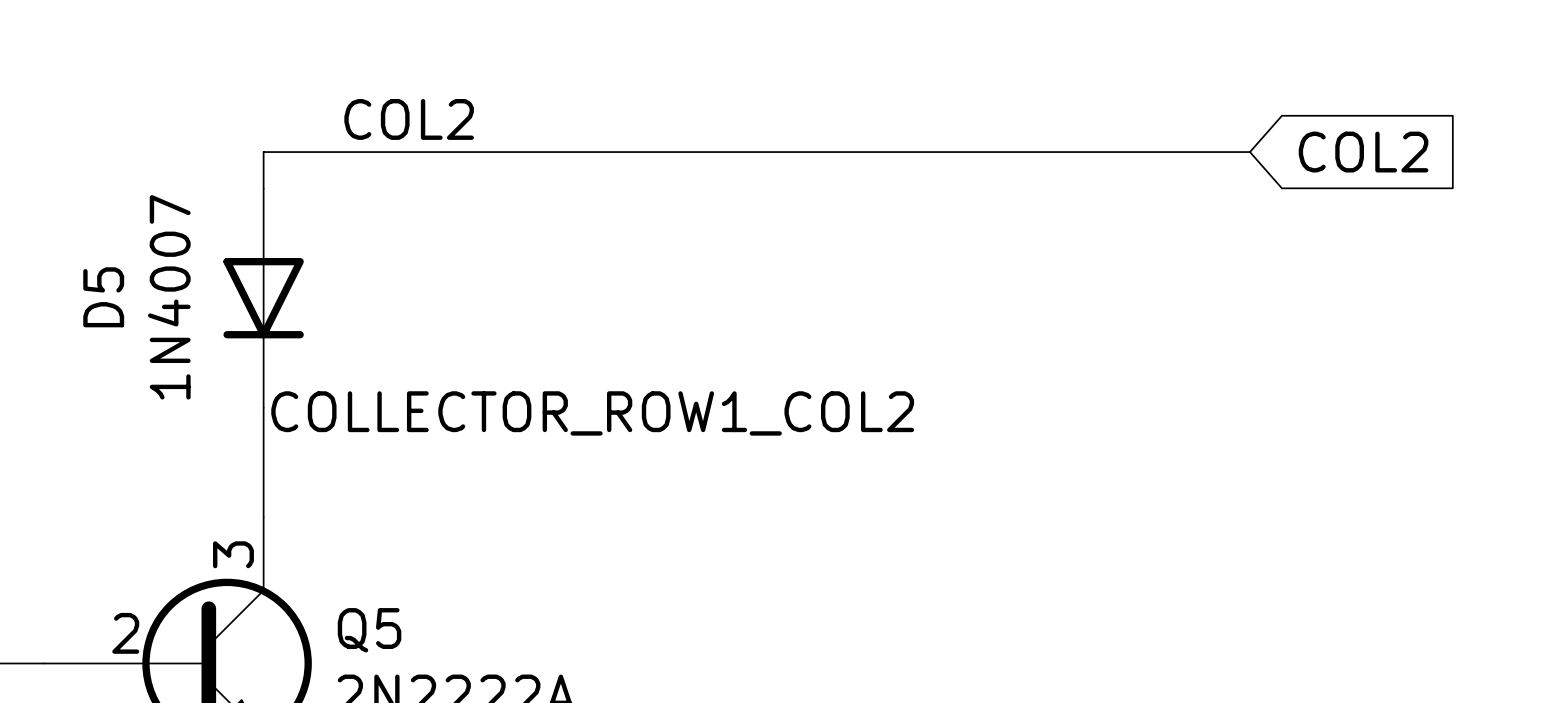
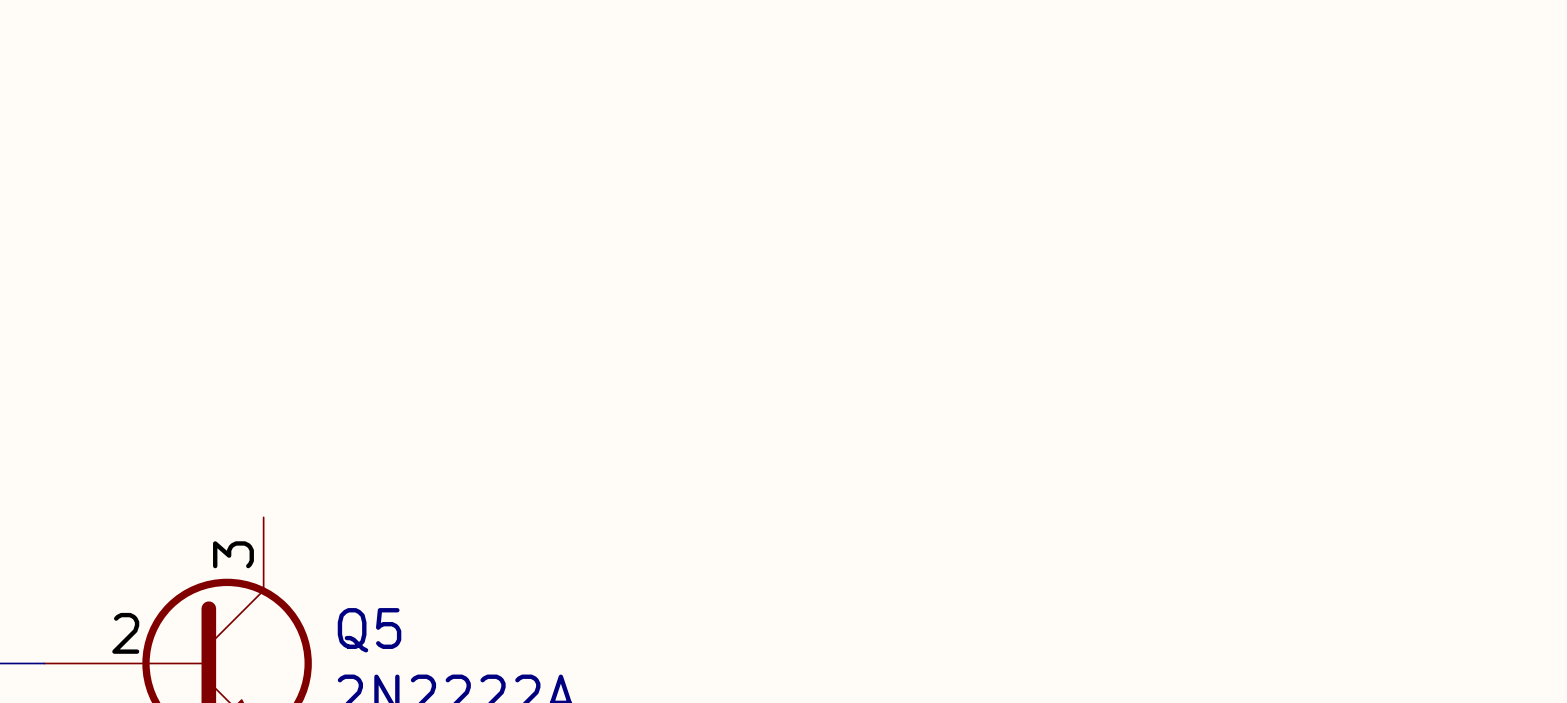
label: COL2 (409, 119) -> none
wire: (1249, 152) (263, 152) (263, 188) -> none
global label: COL2 (1363, 152) -> none
D5: 1N4007 (263, 298) -> none
wire: (263, 407) (263, 517) -> none
label: COLLECTOR_ROW1_COL2 (592, 413) -> none

